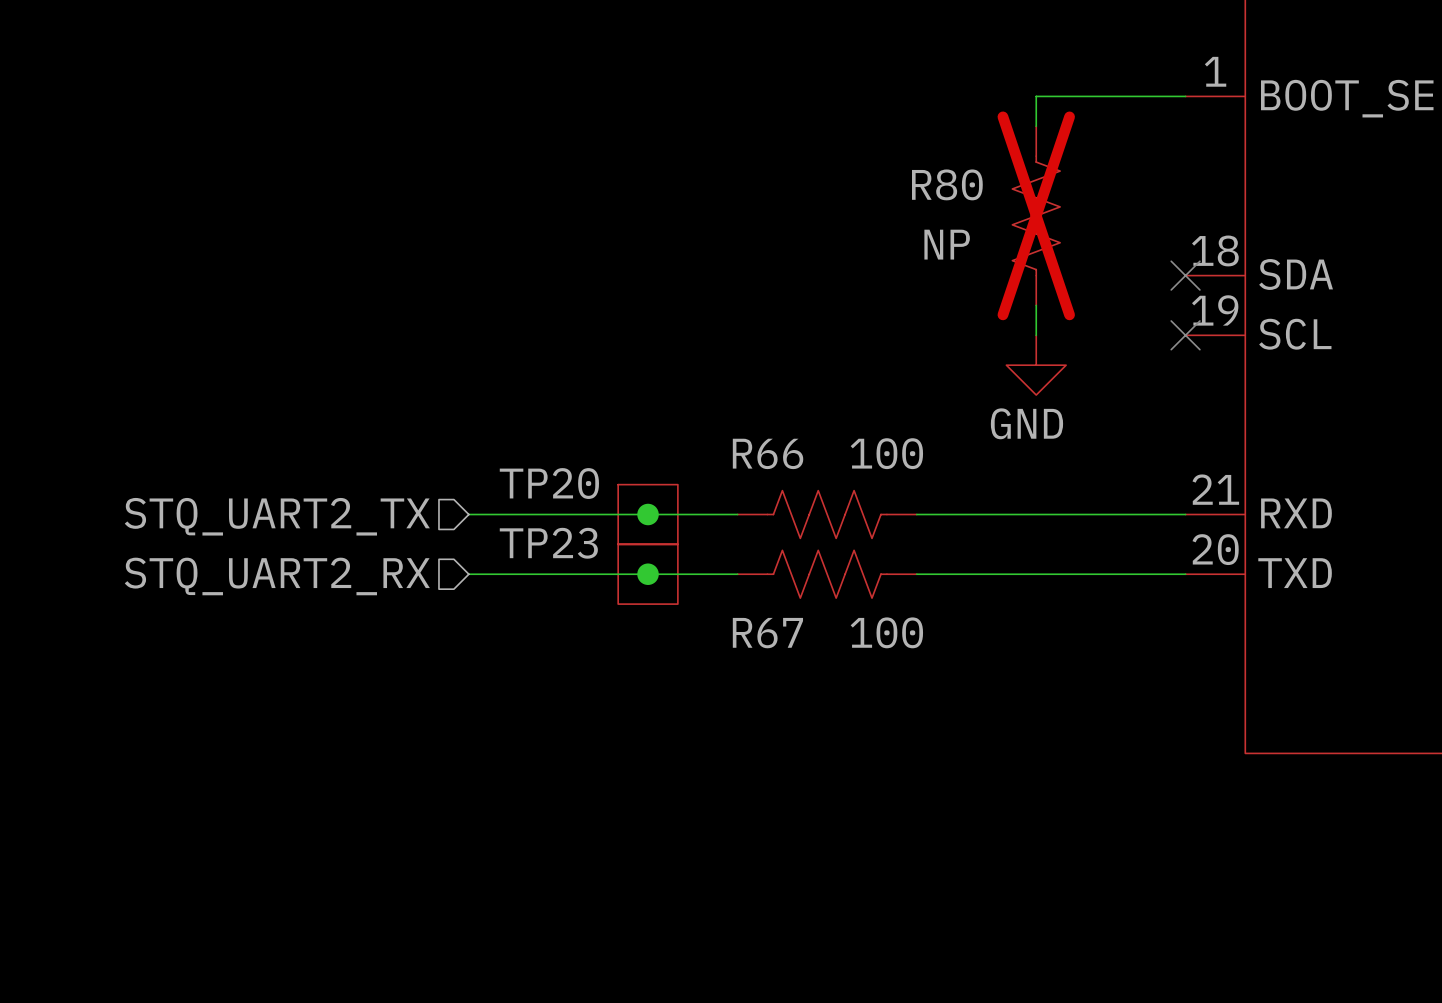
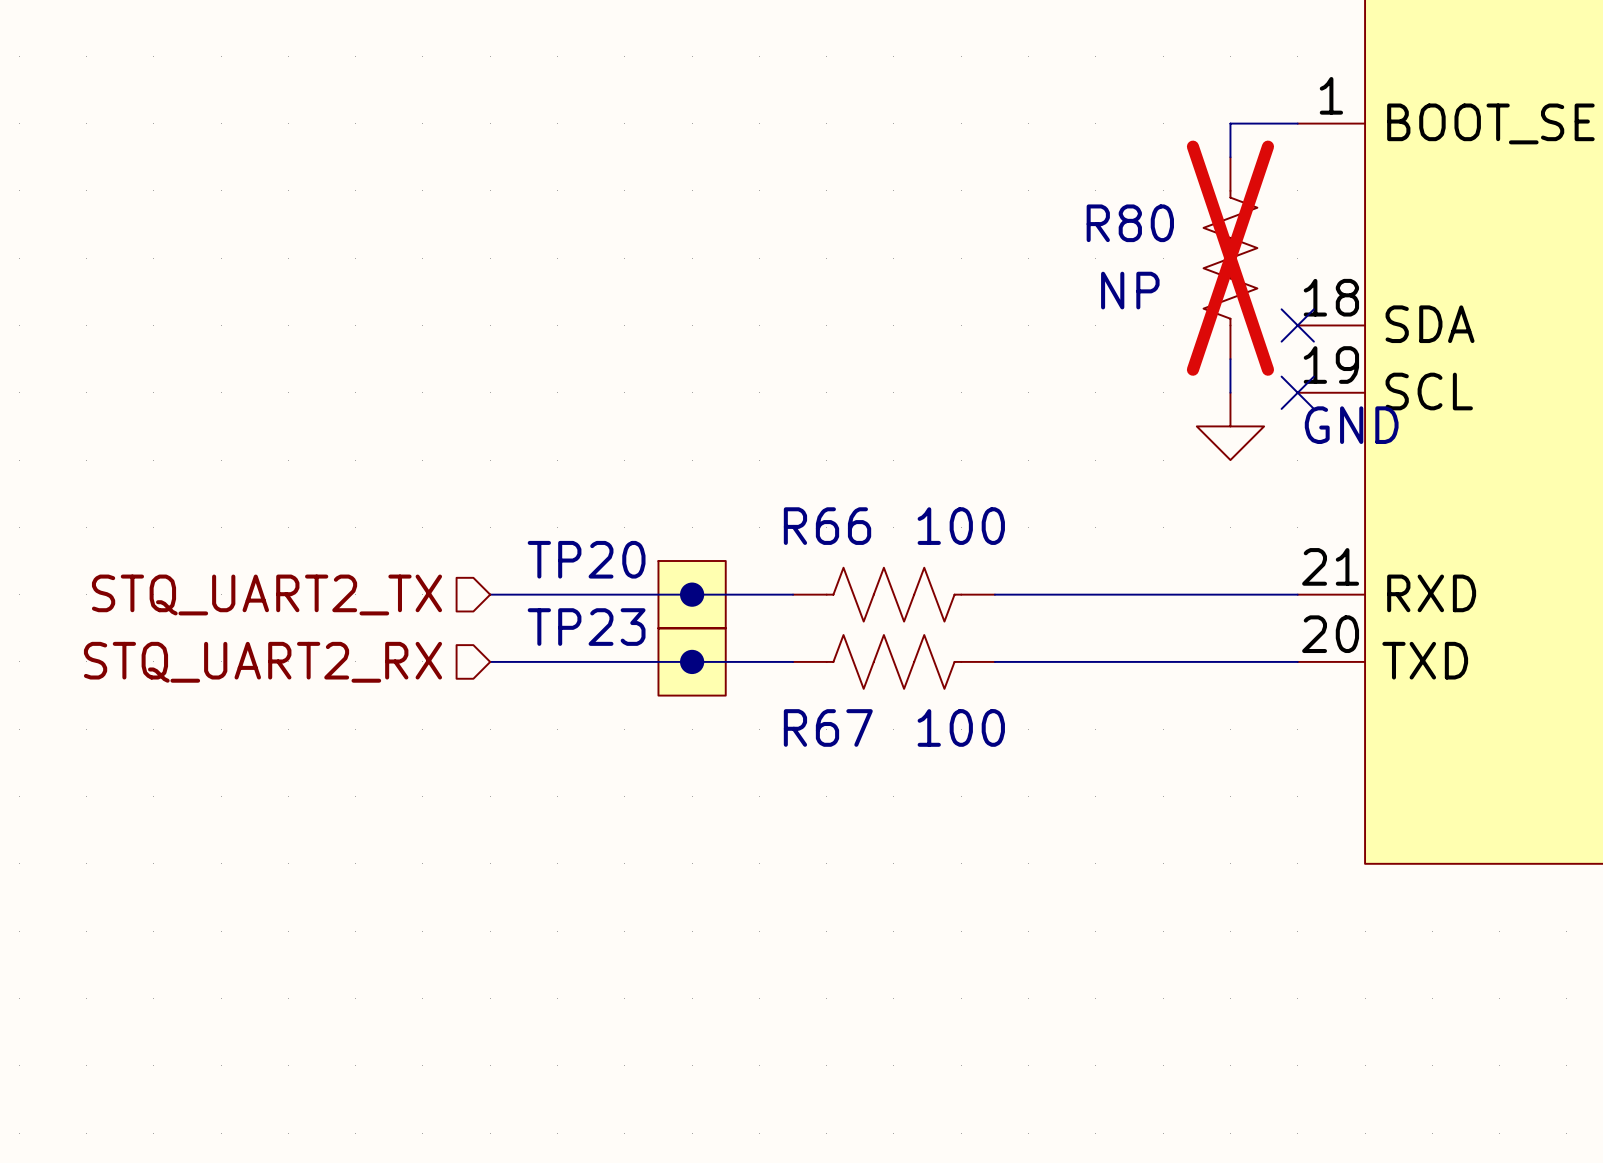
wire: (1125, 96) (1036, 96) (1036, 126) -> (1230, 123) (1230, 157)
R80 position: (1036, 215) -> (1230, 258)
wire: (1036, 305) (1036, 335) -> (1230, 359) (1230, 392)
power symbol position: GND (1036, 365) -> GND (1230, 426)
power symbol text position: GND (1026, 423) -> GND (1351, 425)

